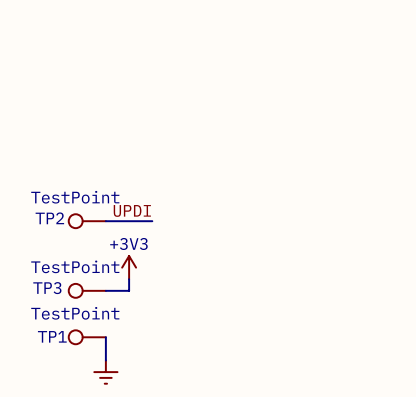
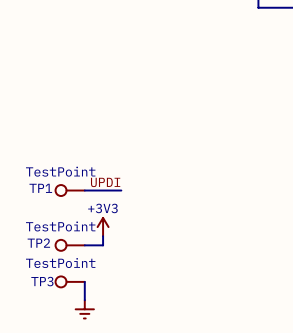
TP2 name: TP2 (49, 218) -> TP1 (40, 188)
TP3 name: TP3 (47, 288) -> TP2 (38, 243)
TP1 name: TP1 (52, 336) -> TP3 (42, 281)

